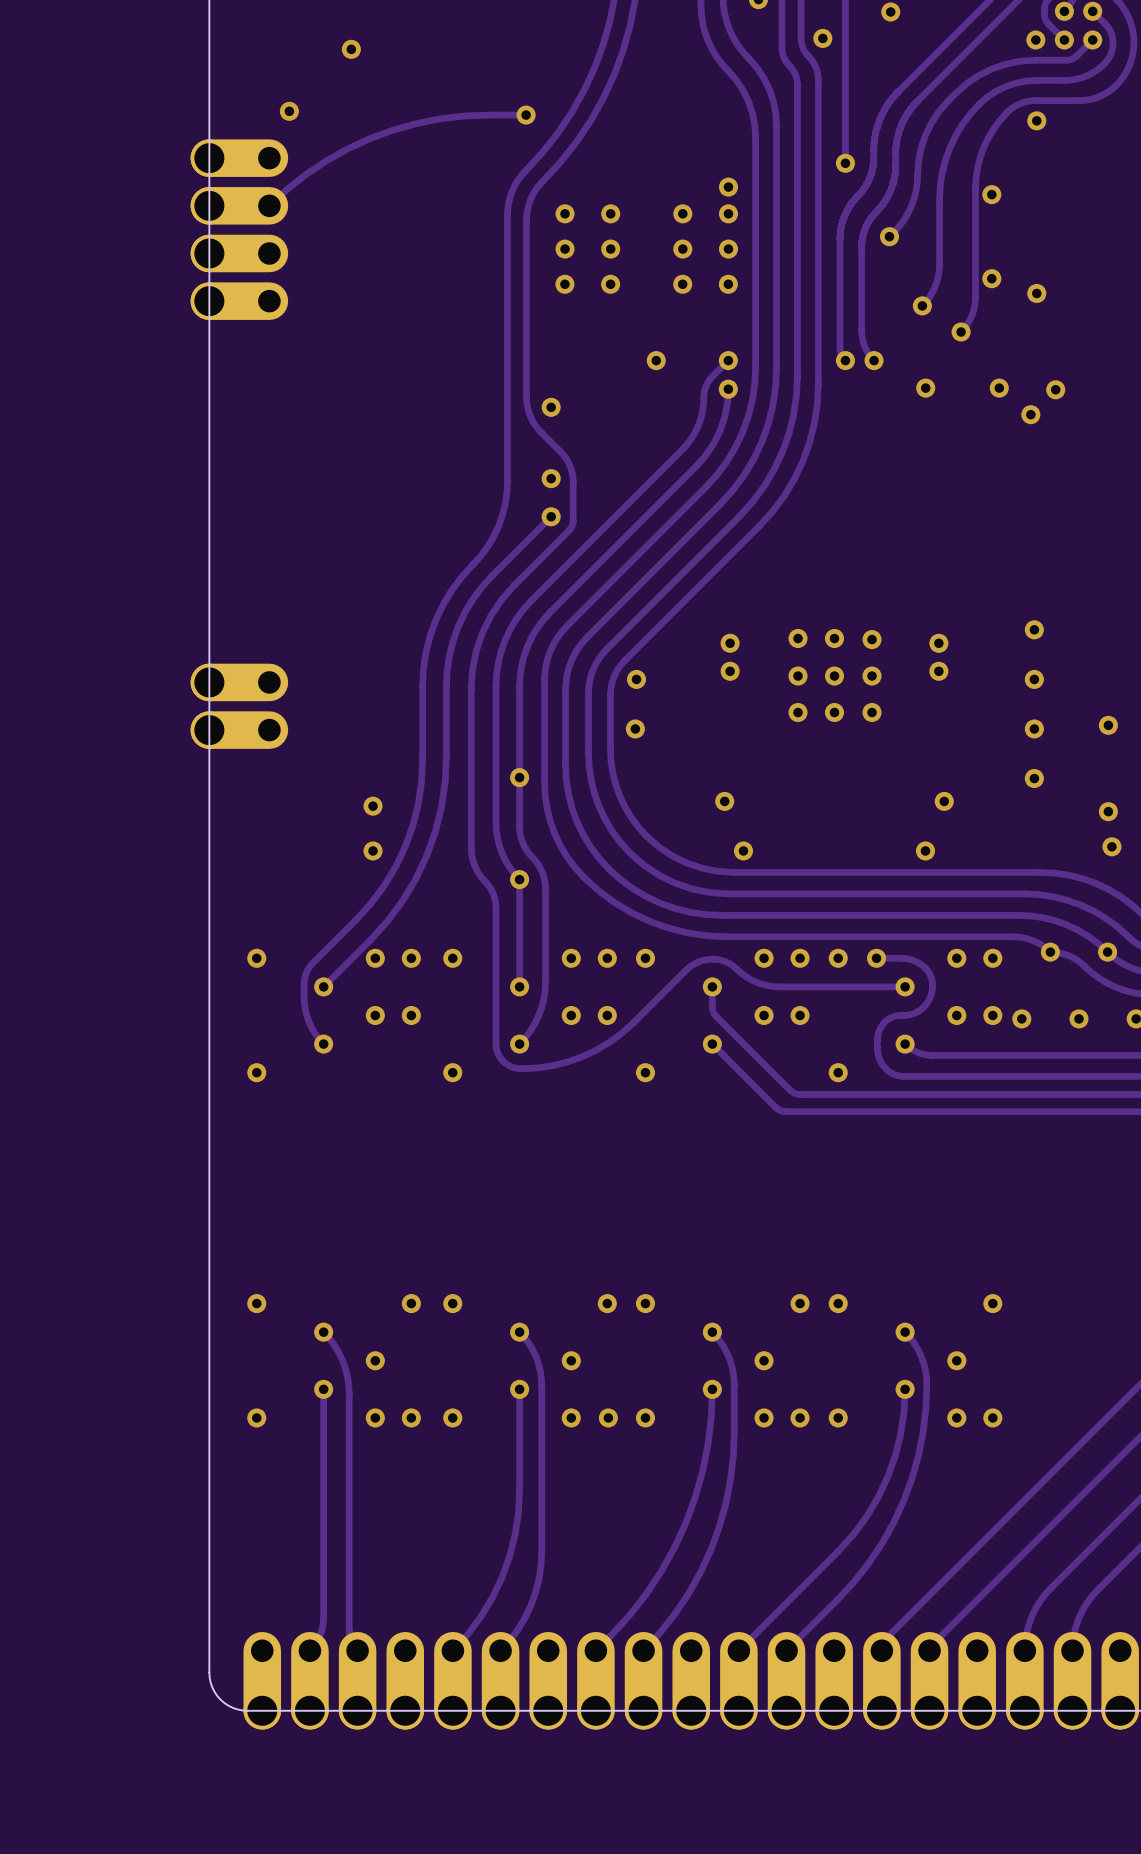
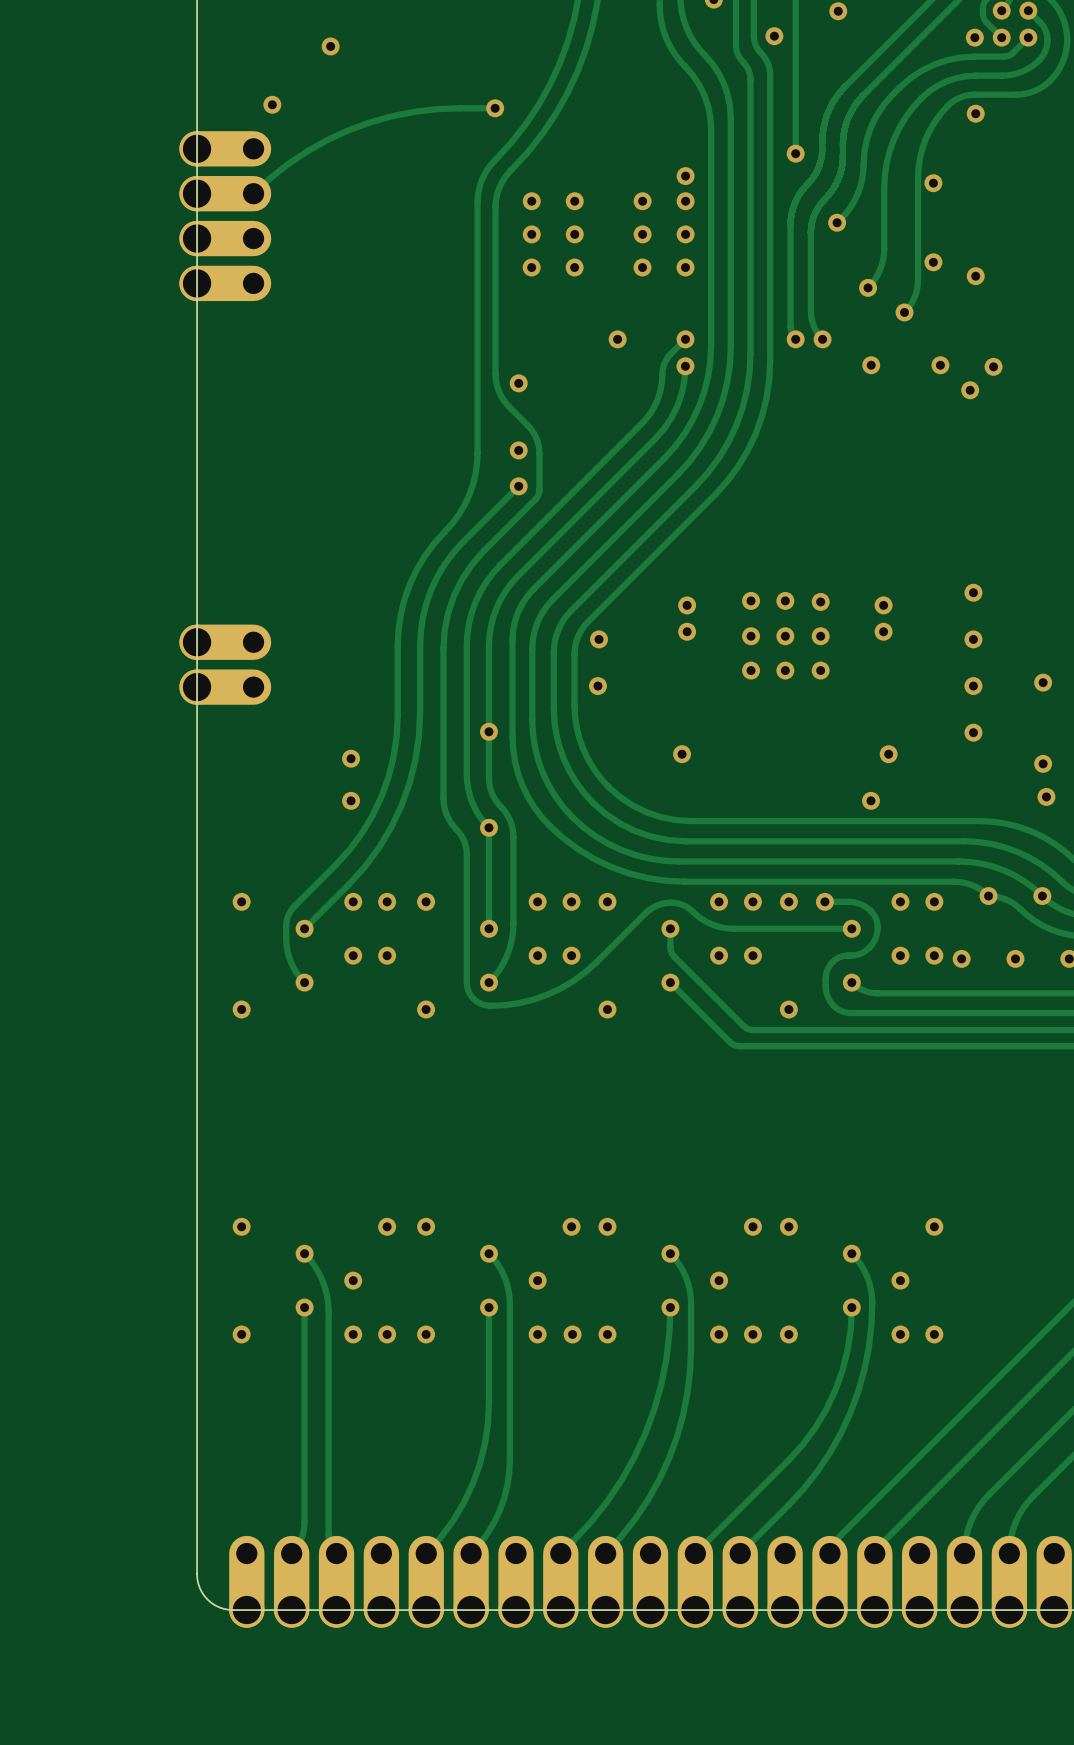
via: (743, 850) -> none

